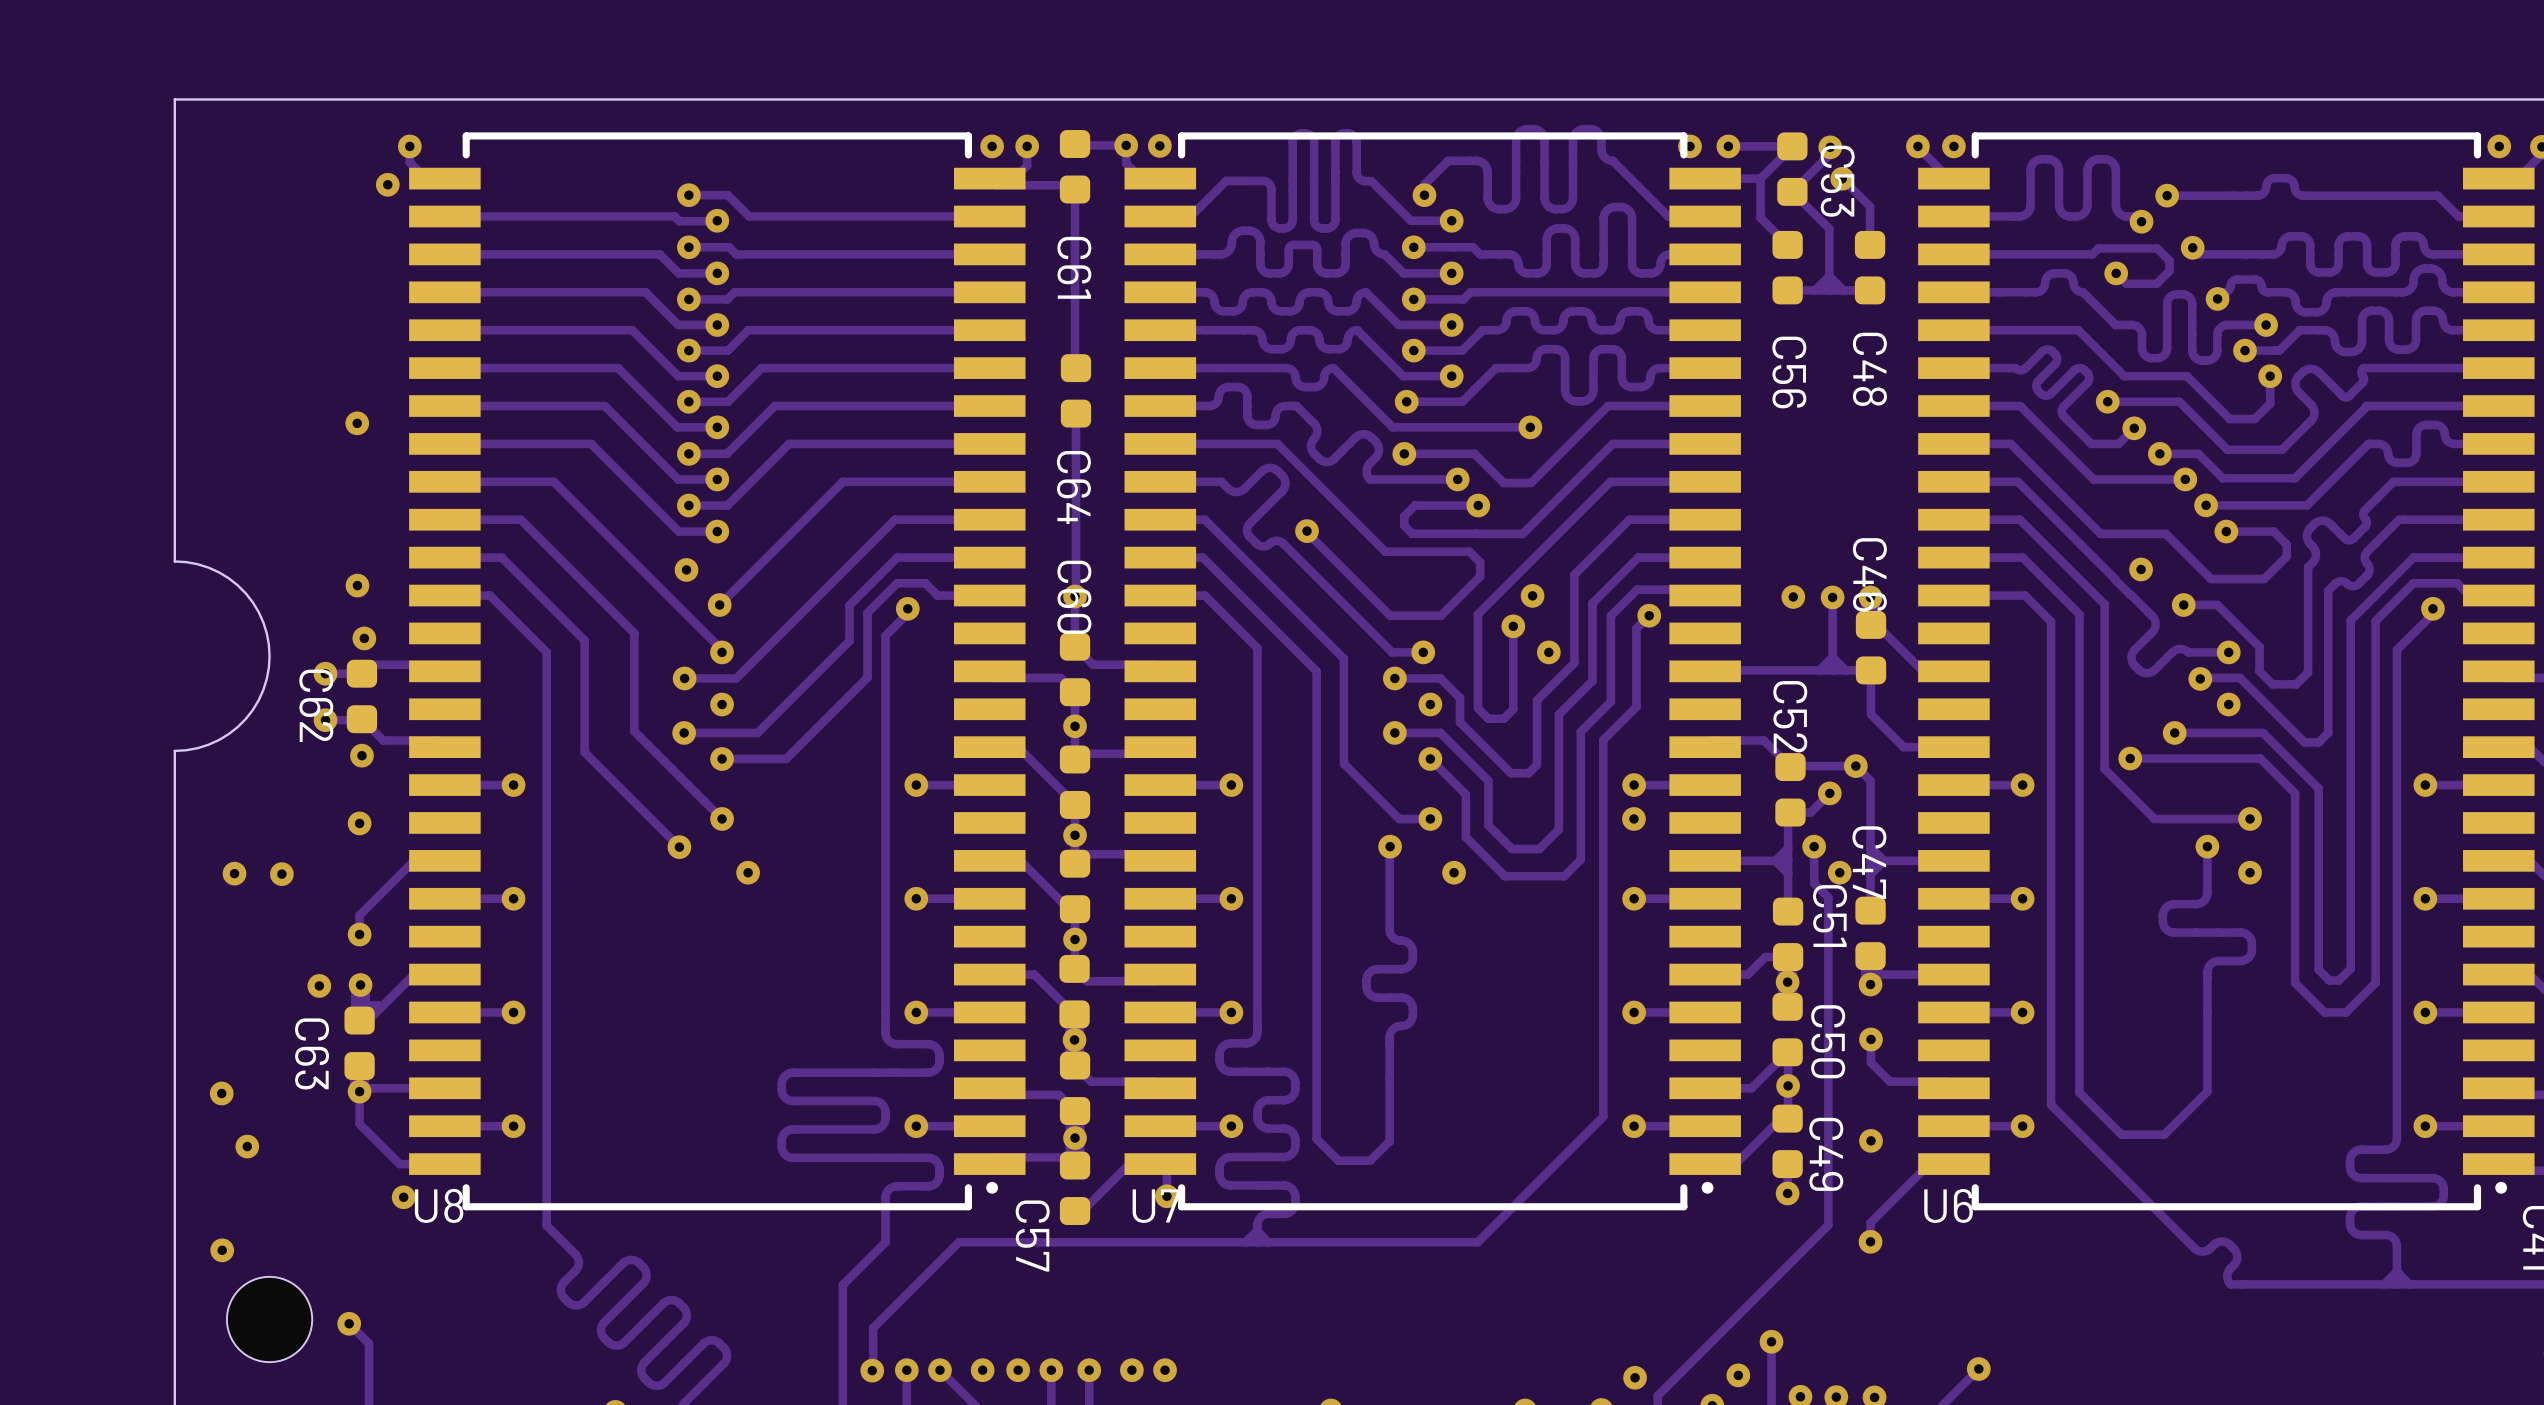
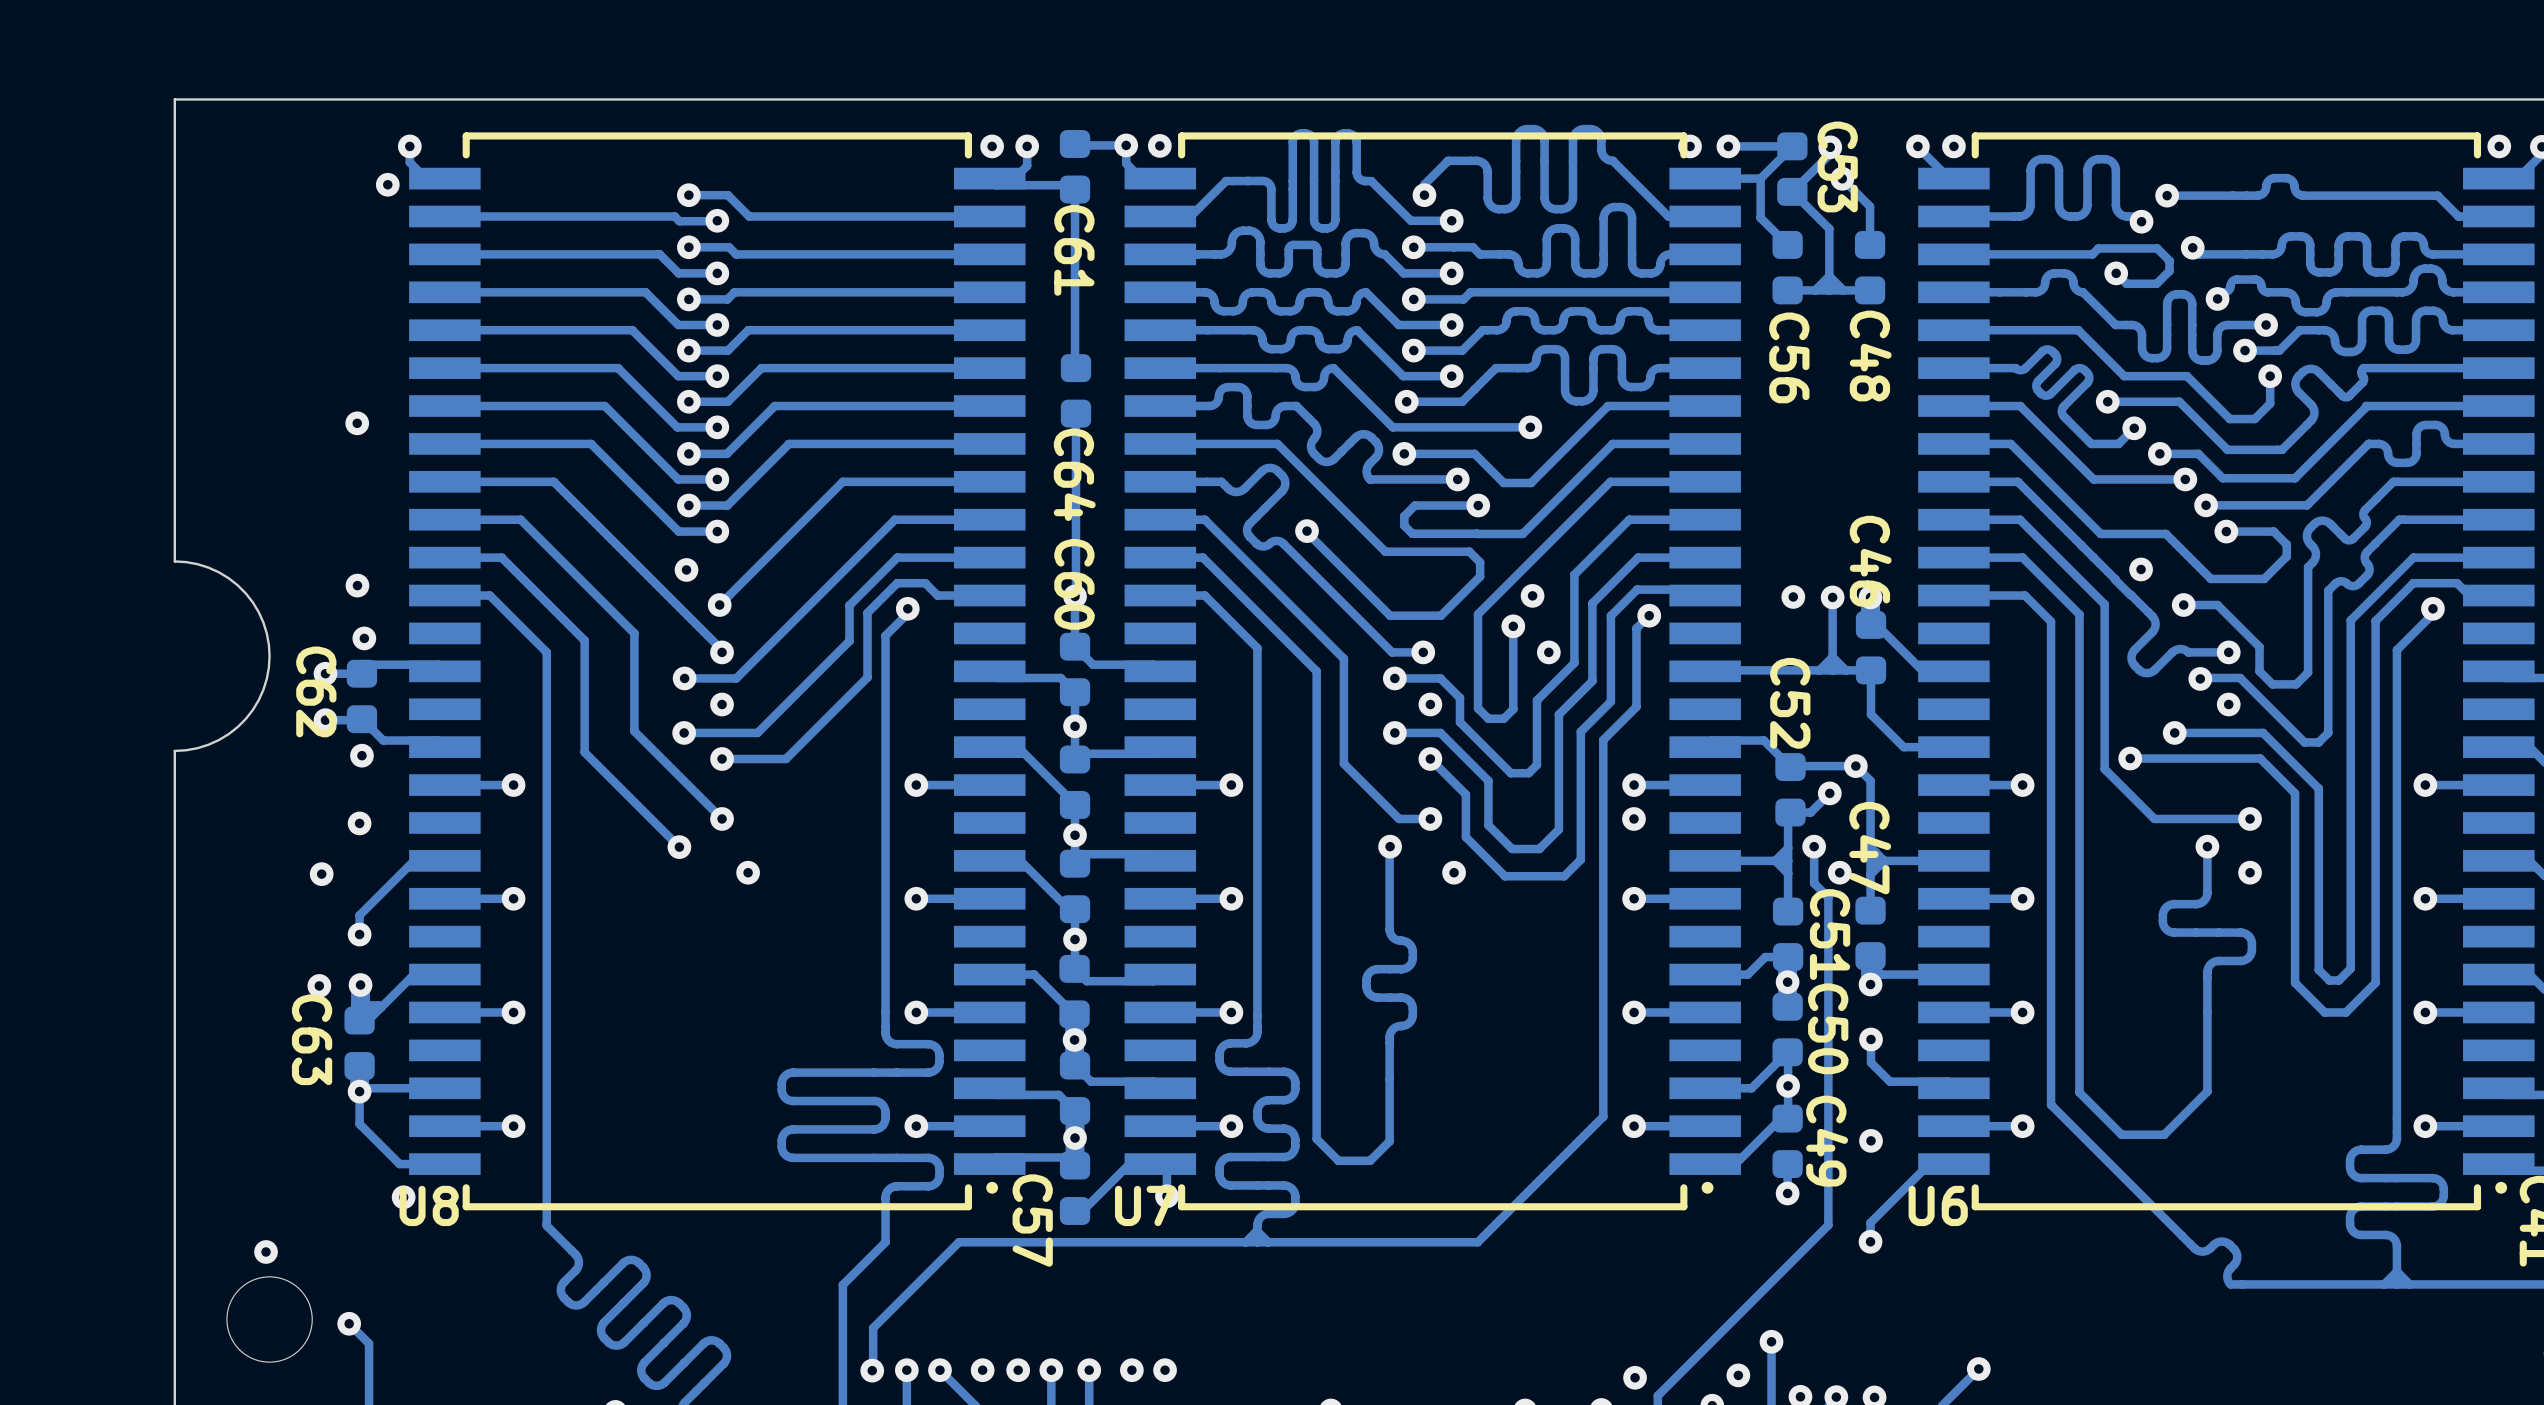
via: (234, 873) -> none
via position: (281, 874) -> (321, 874)
via: (221, 1093) -> none
via: (247, 1146) -> none
via position: (222, 1250) -> (266, 1251)

